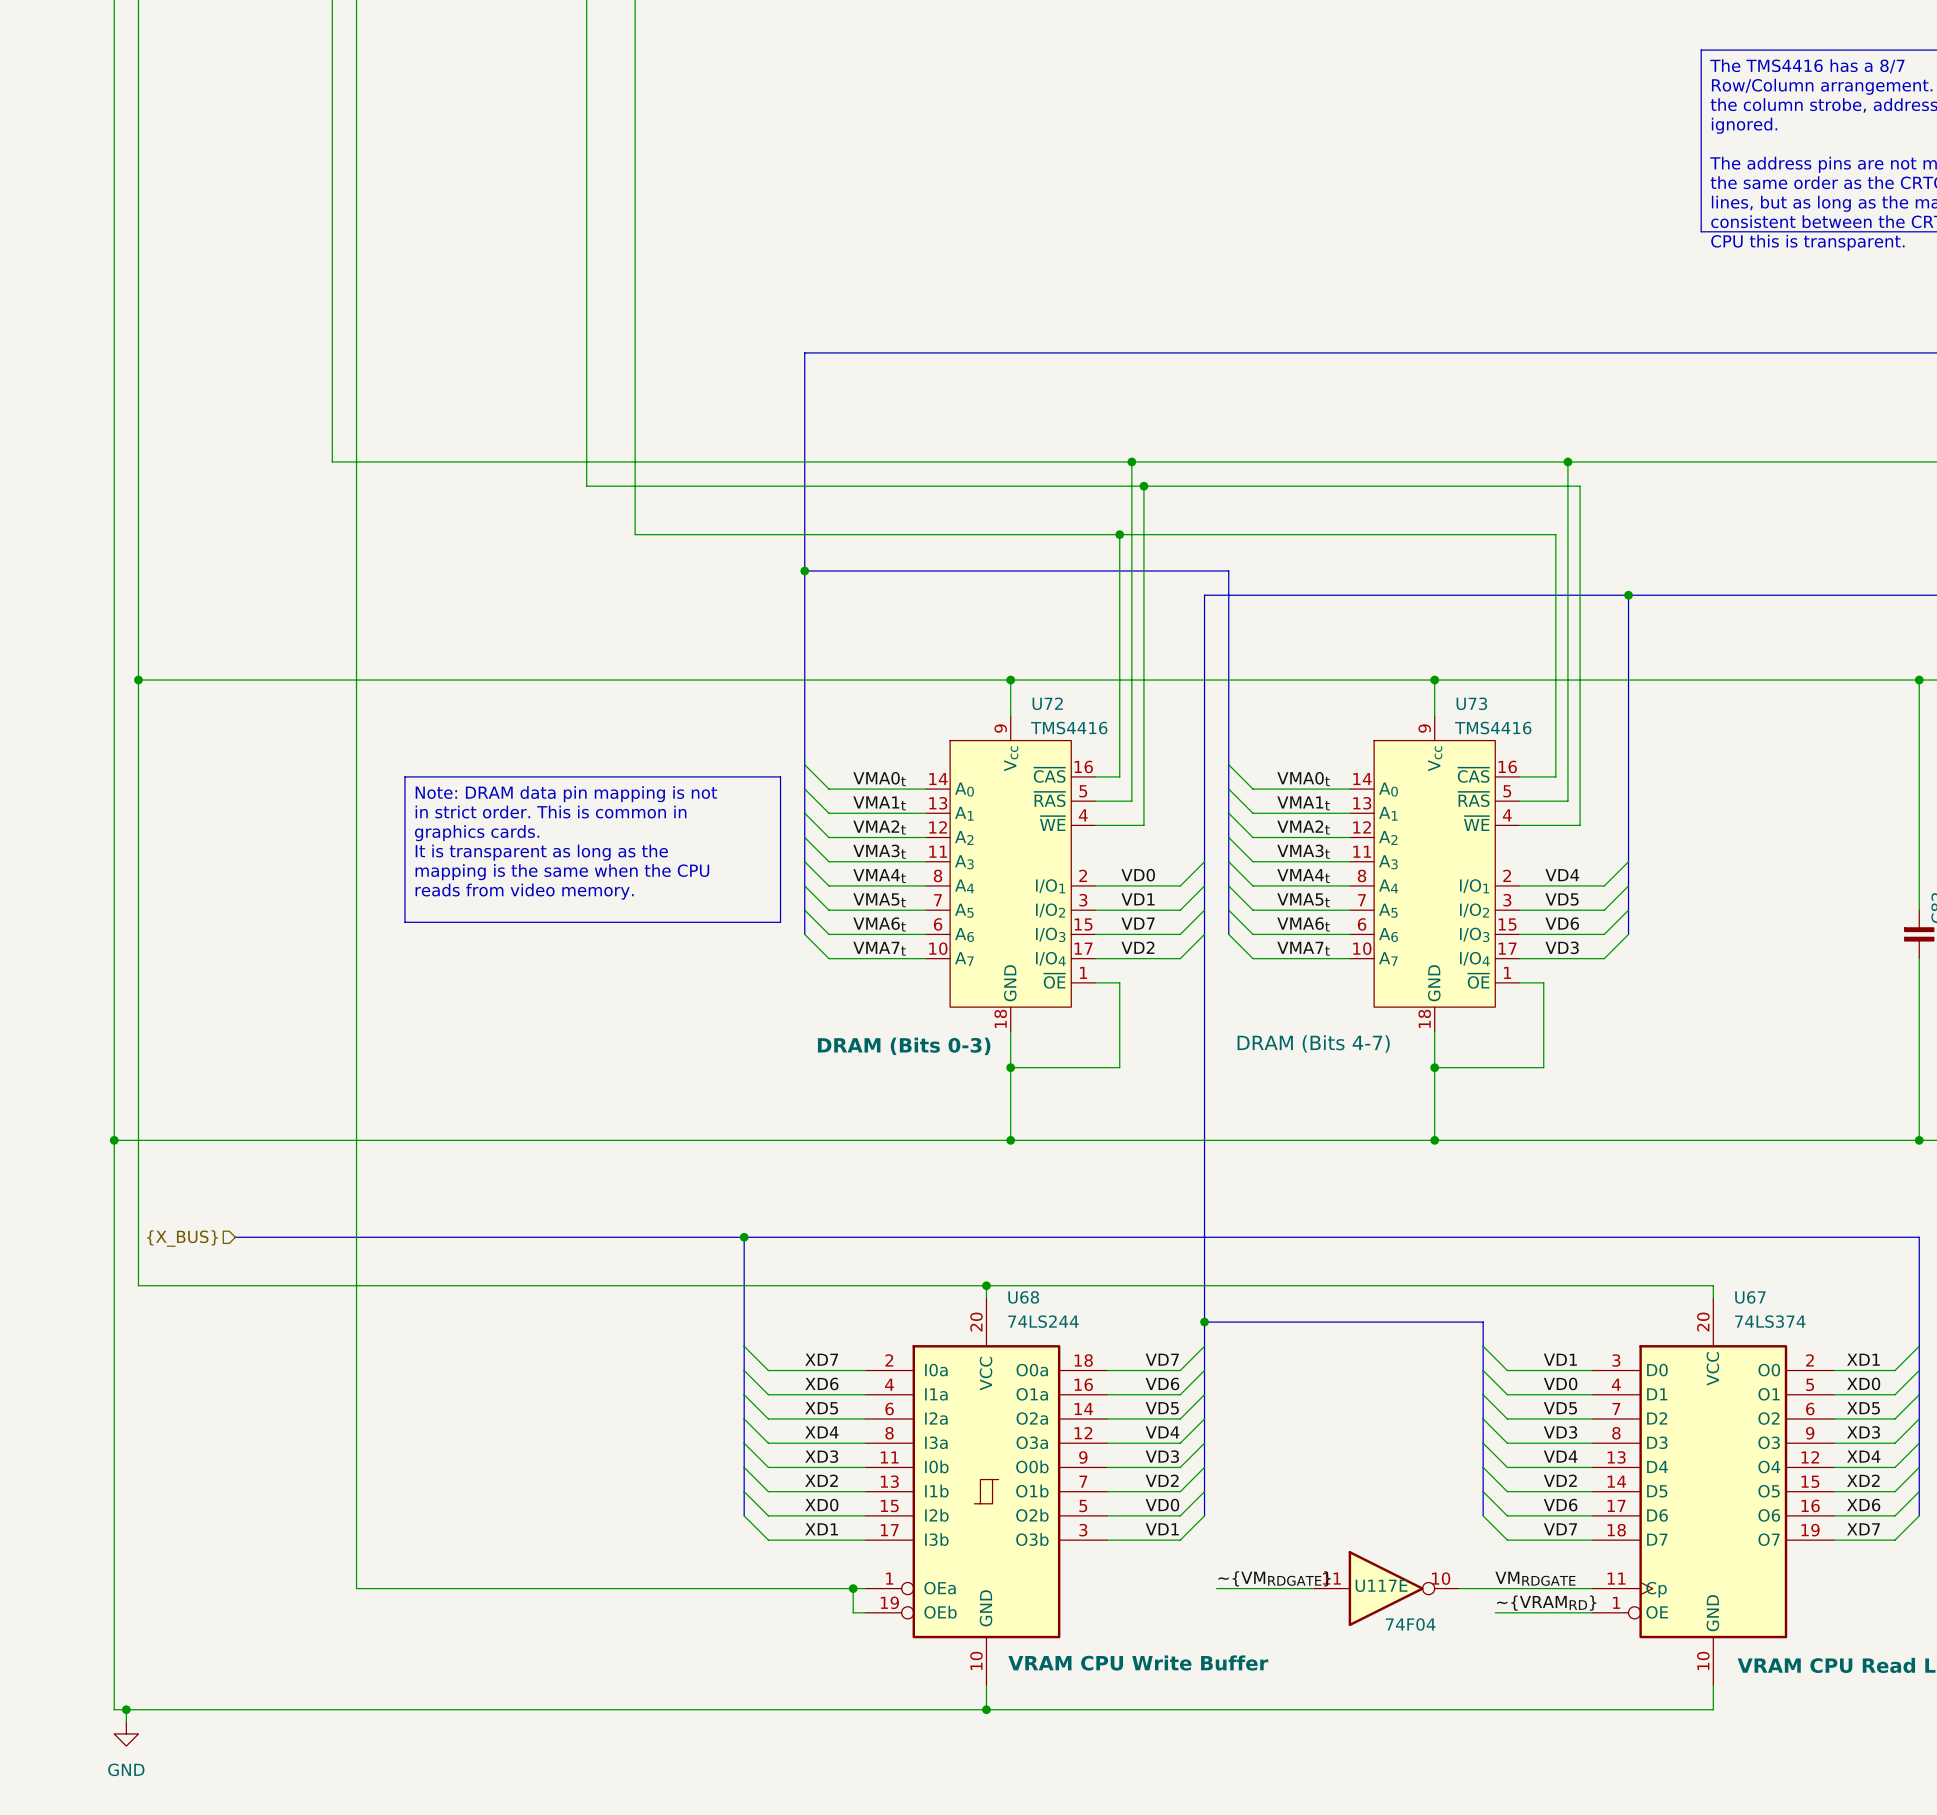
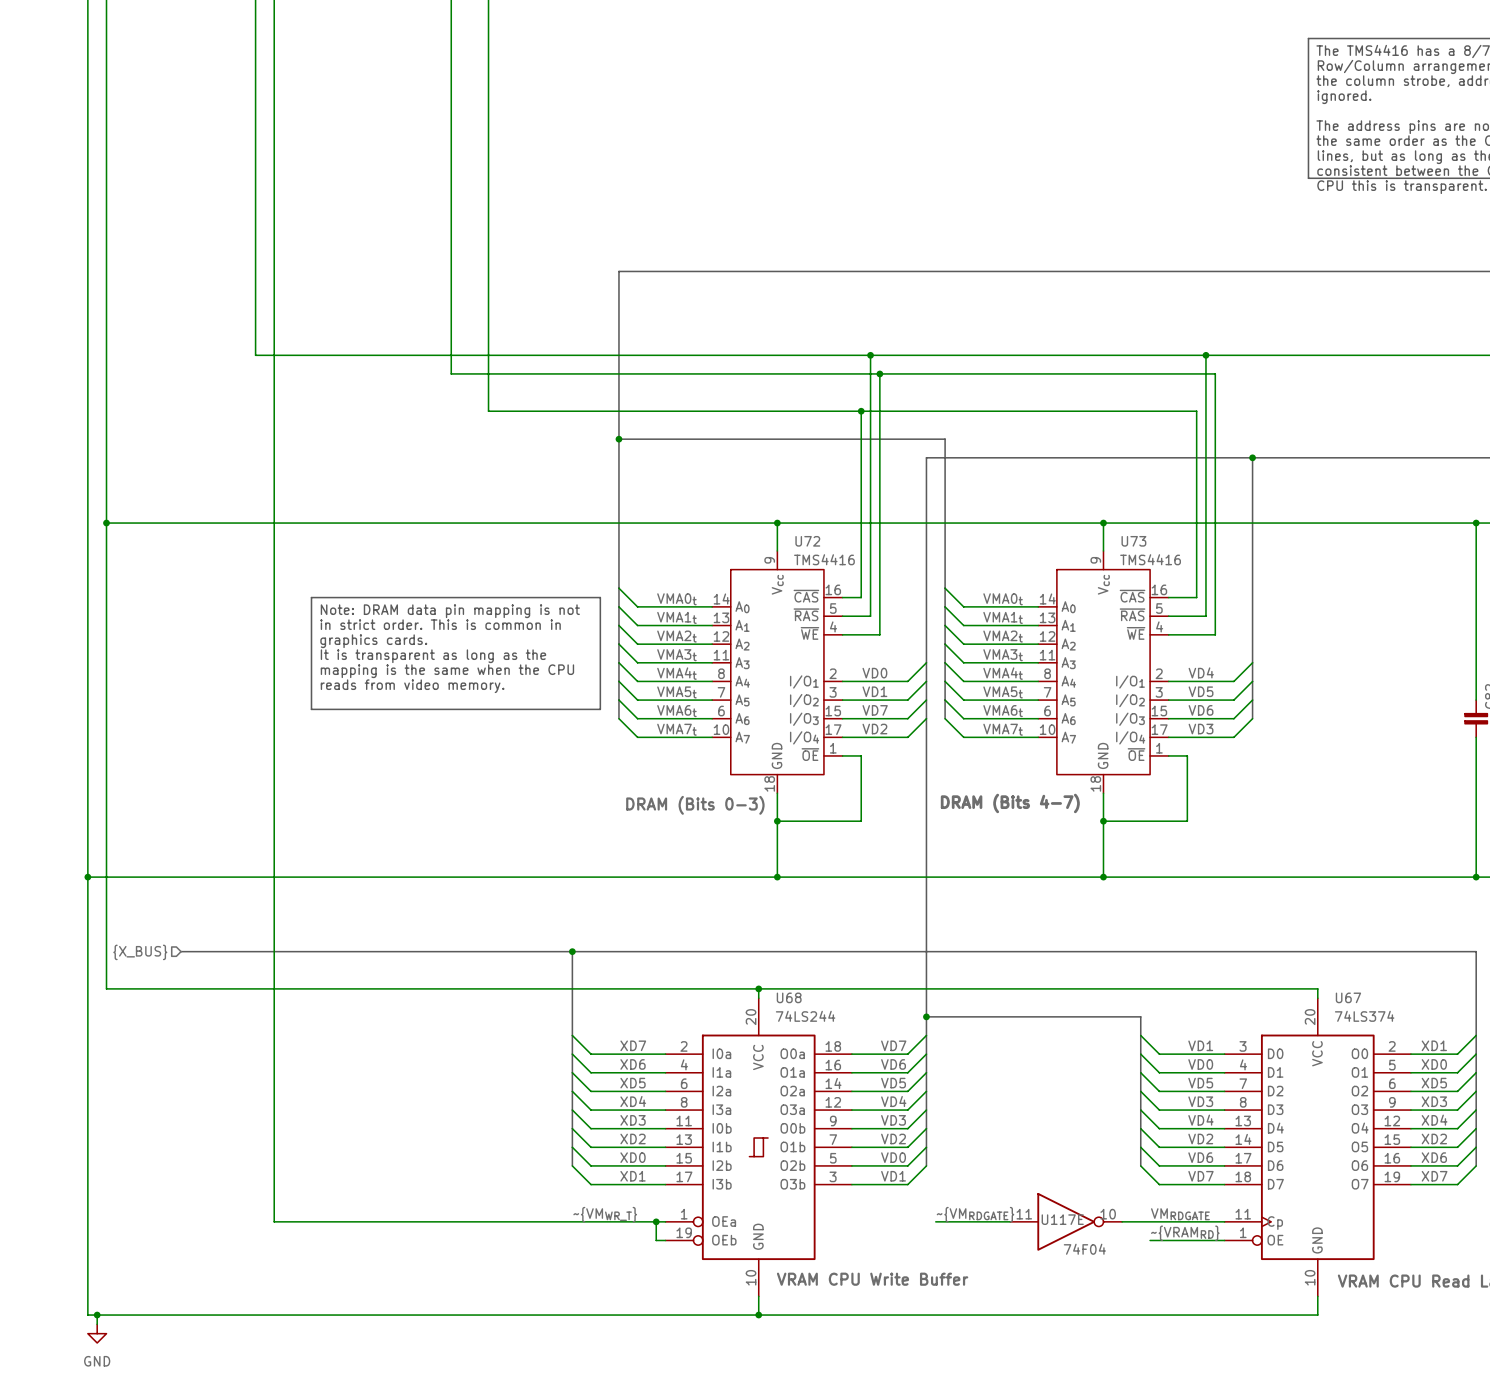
label: none -> ~{VMWR_T} (605, 1214)

